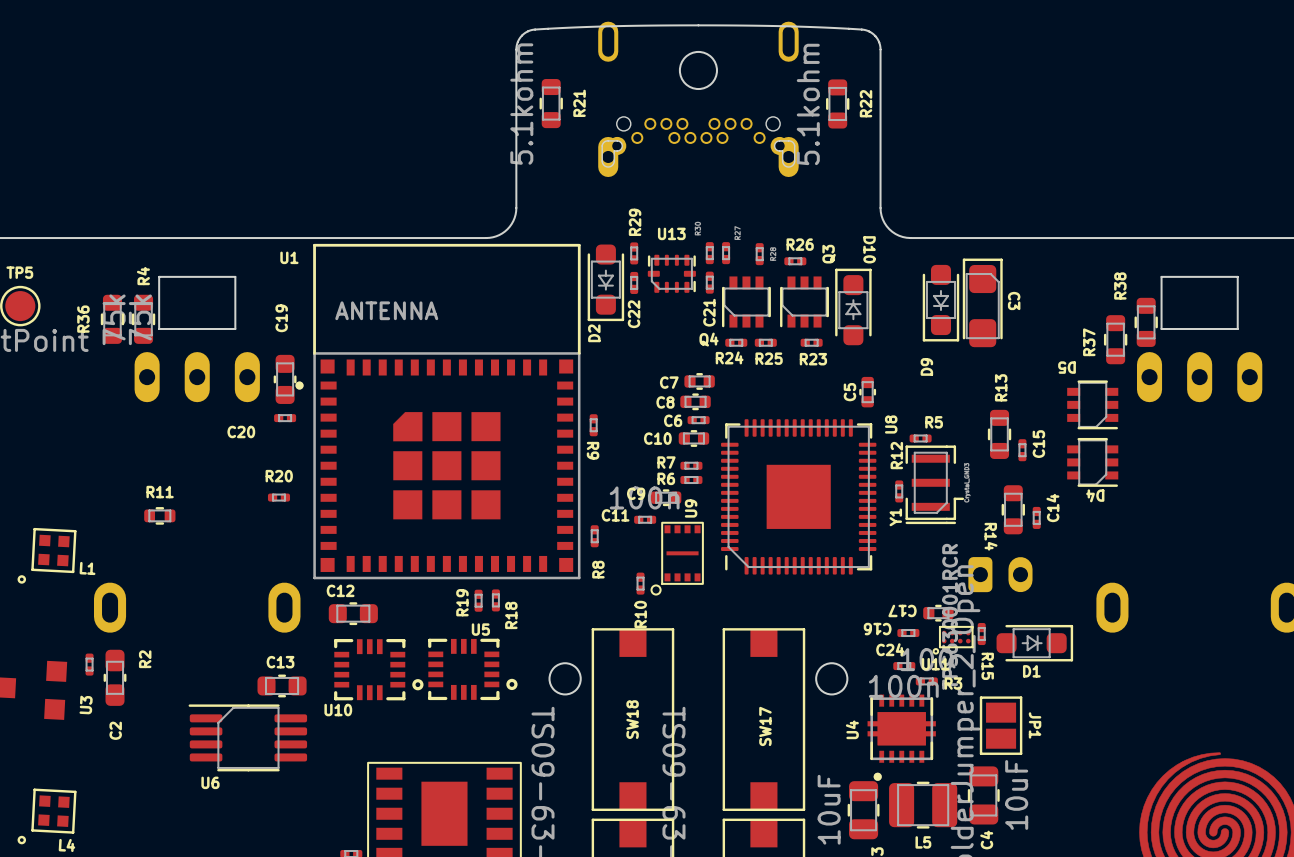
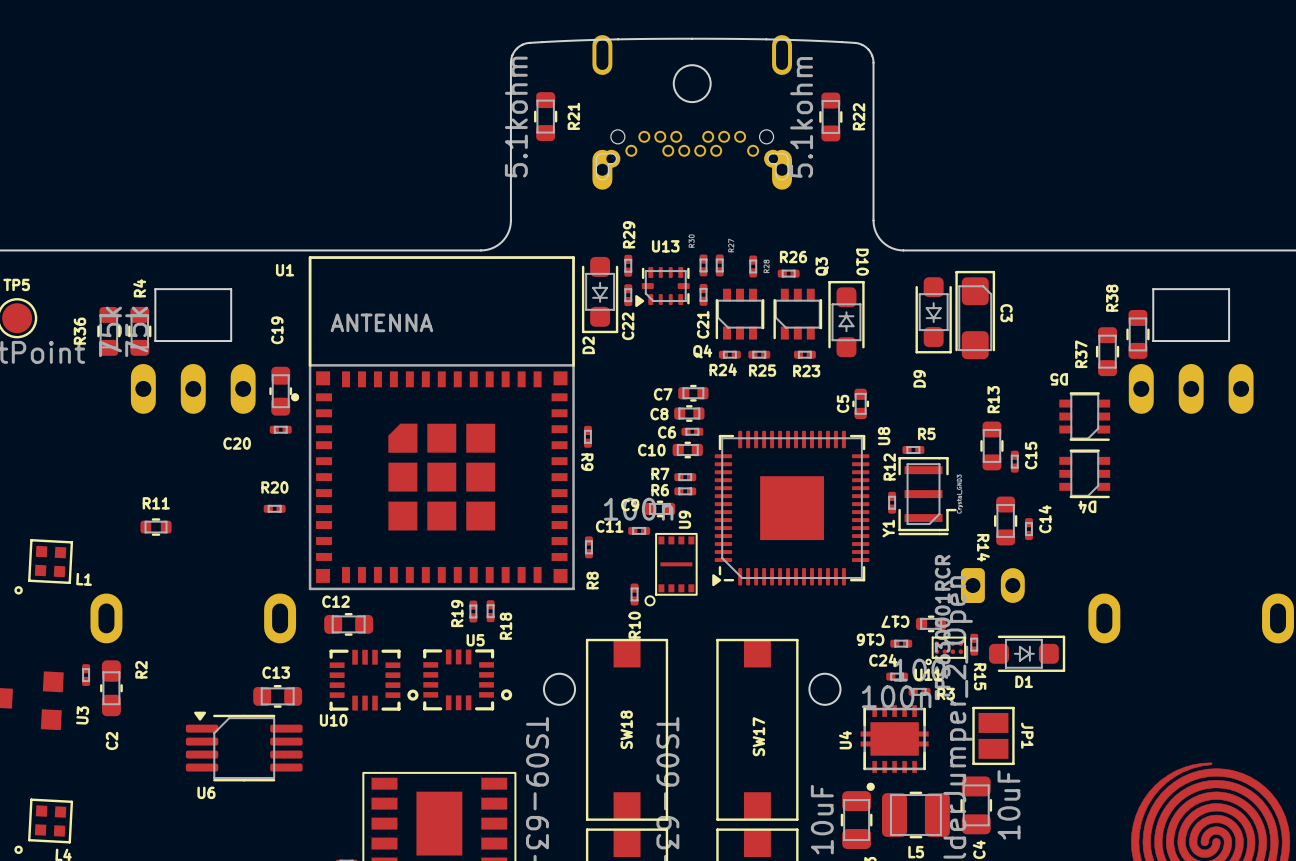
U13 footprint: [647, 254, 696, 293] -> [635, 267, 690, 308]
U8 footprint: [721, 419, 877, 575] -> [712, 430, 870, 587]
U6 footprint: [188, 704, 308, 772] -> [185, 711, 303, 782]

